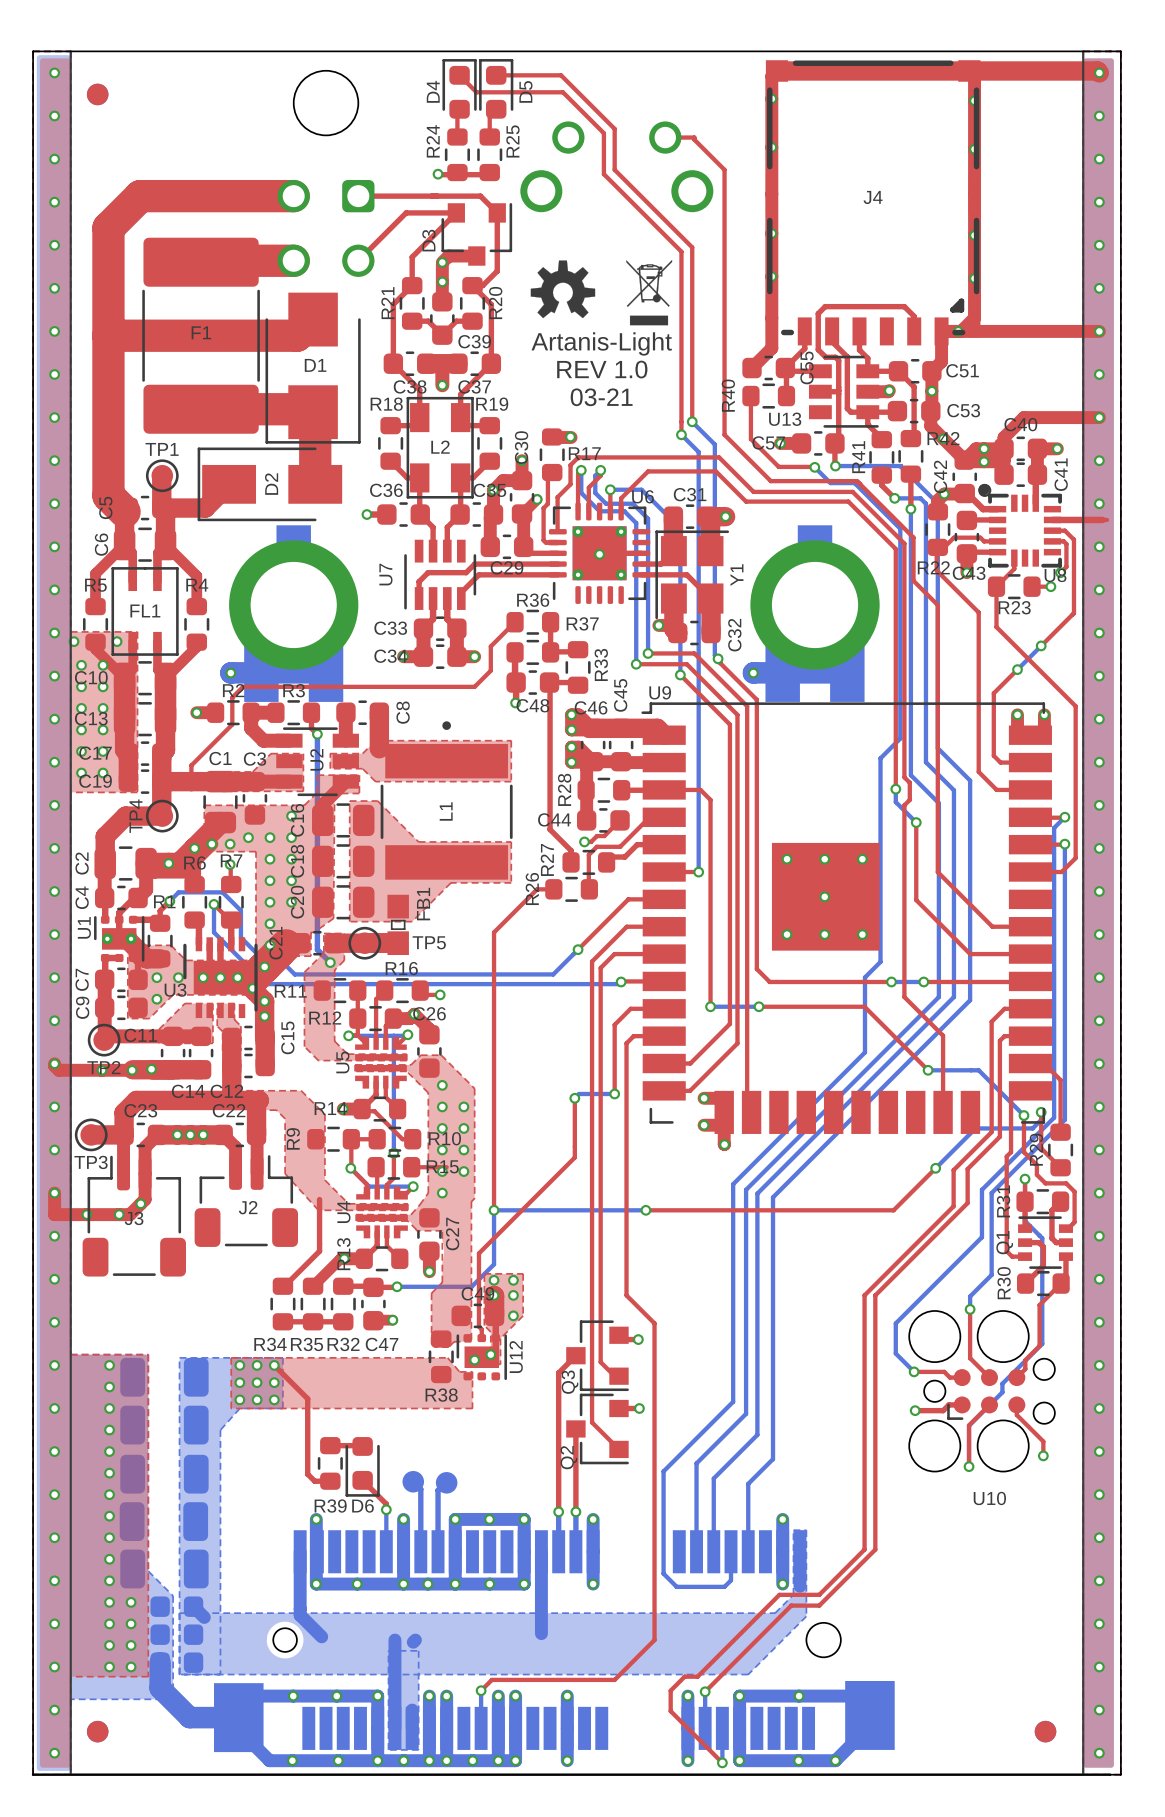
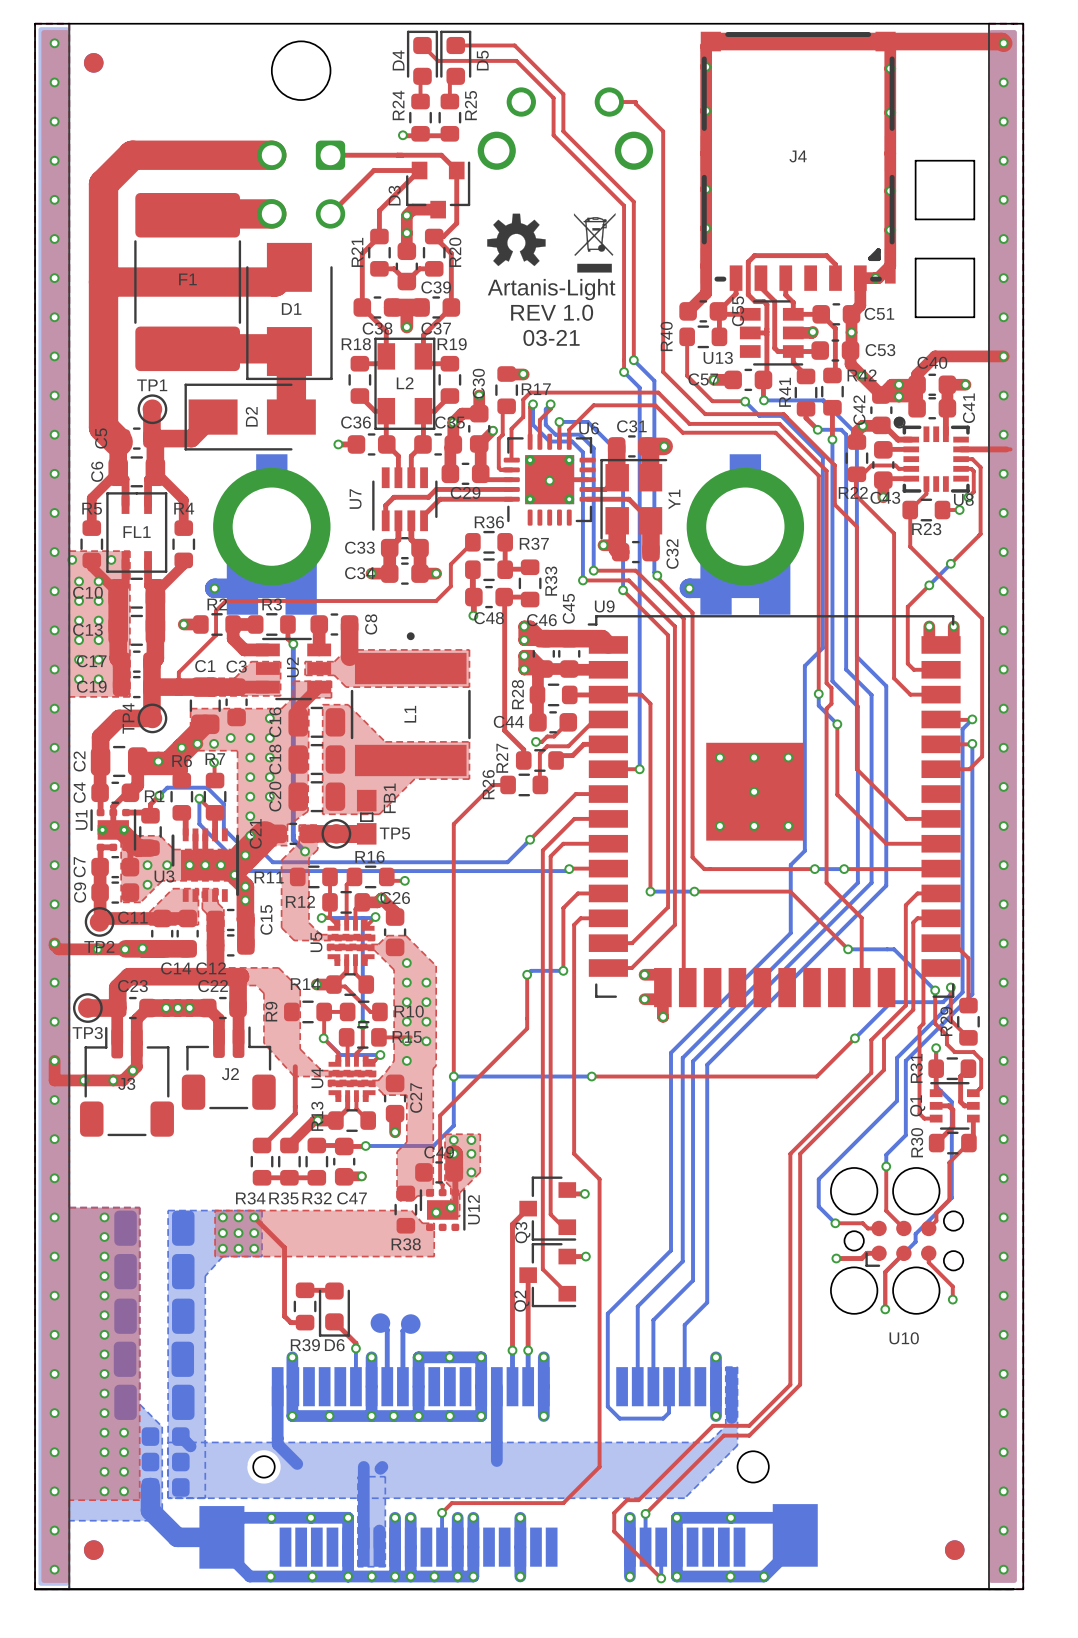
board edge: none -> (915, 160) (915, 219) (974, 219) (974, 160) (915, 160)
board edge: none -> (915, 258) (915, 317) (974, 317) (974, 258) (915, 258)
top track: (961, 331) (1099, 331) -> none

